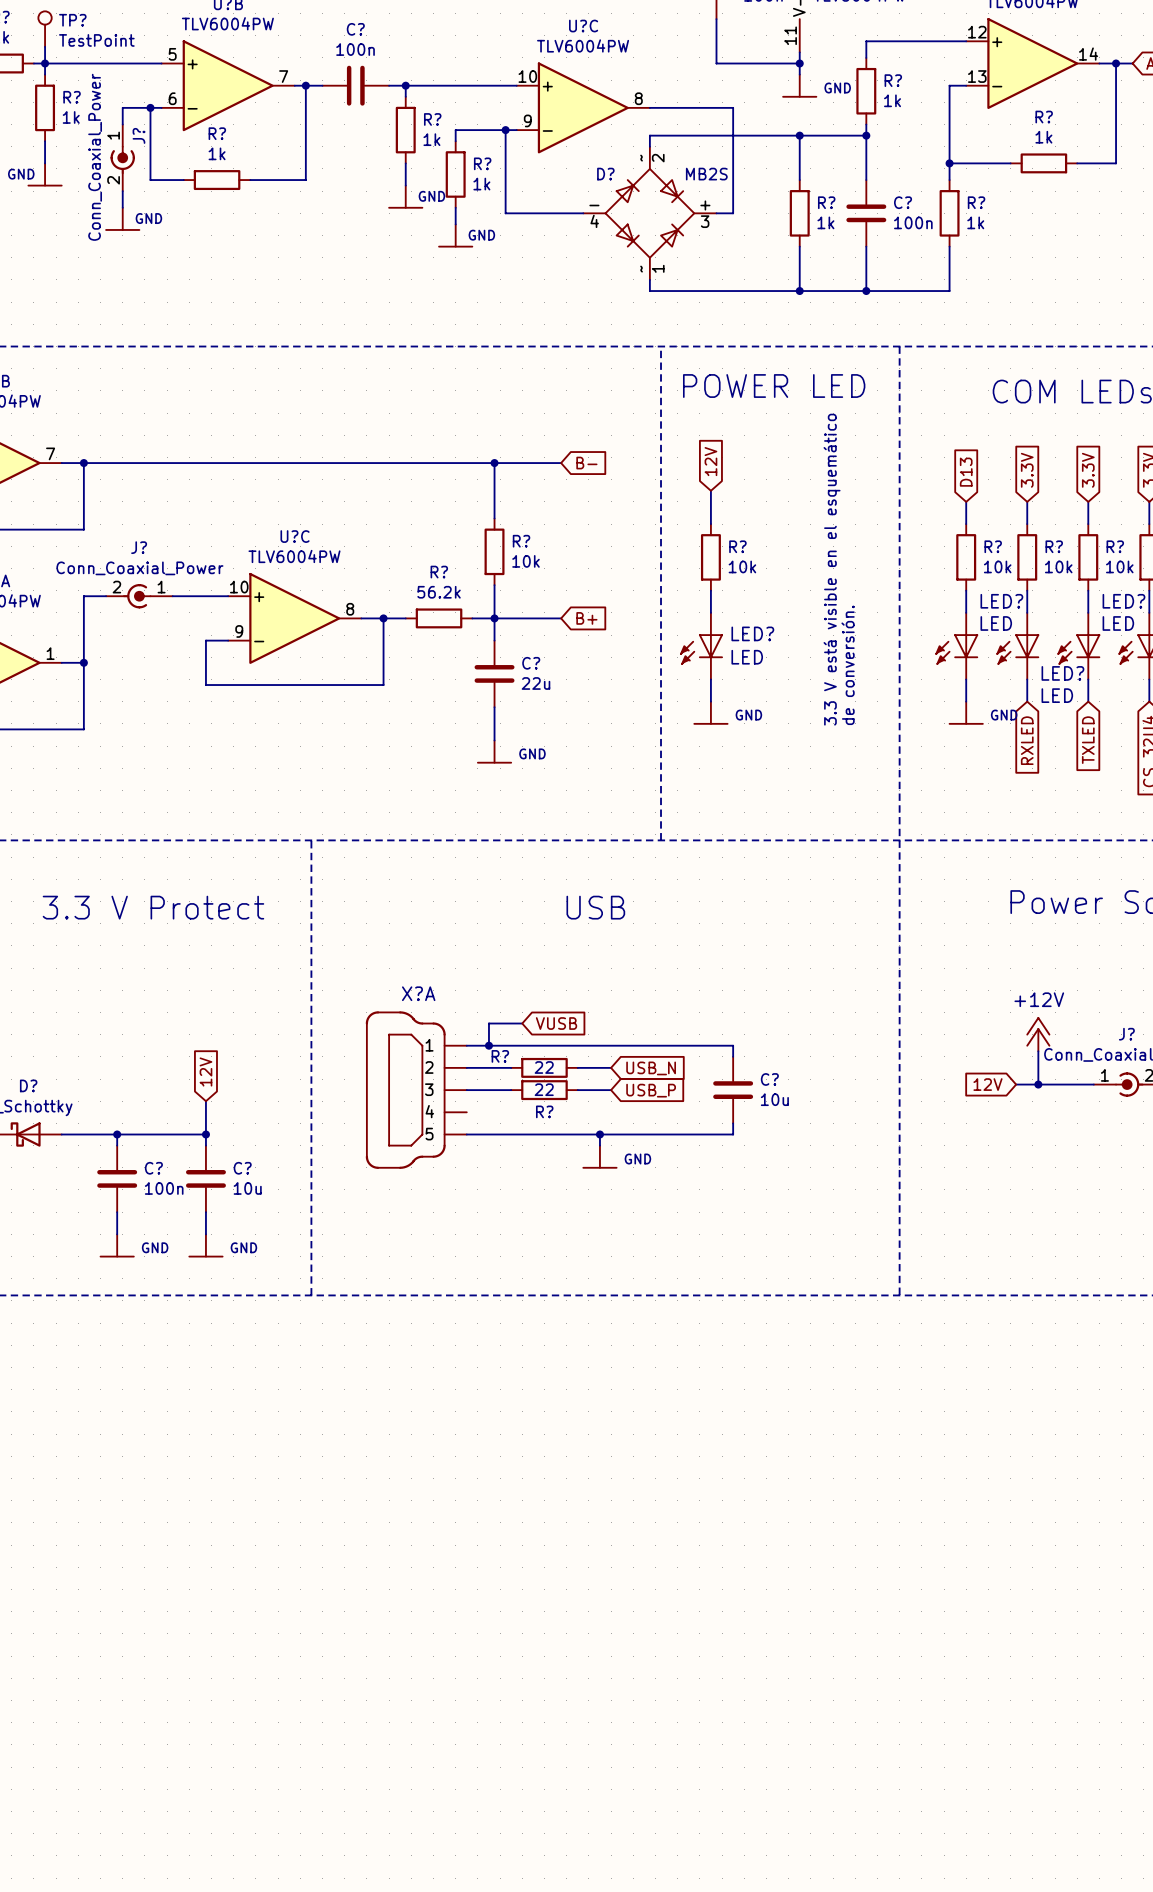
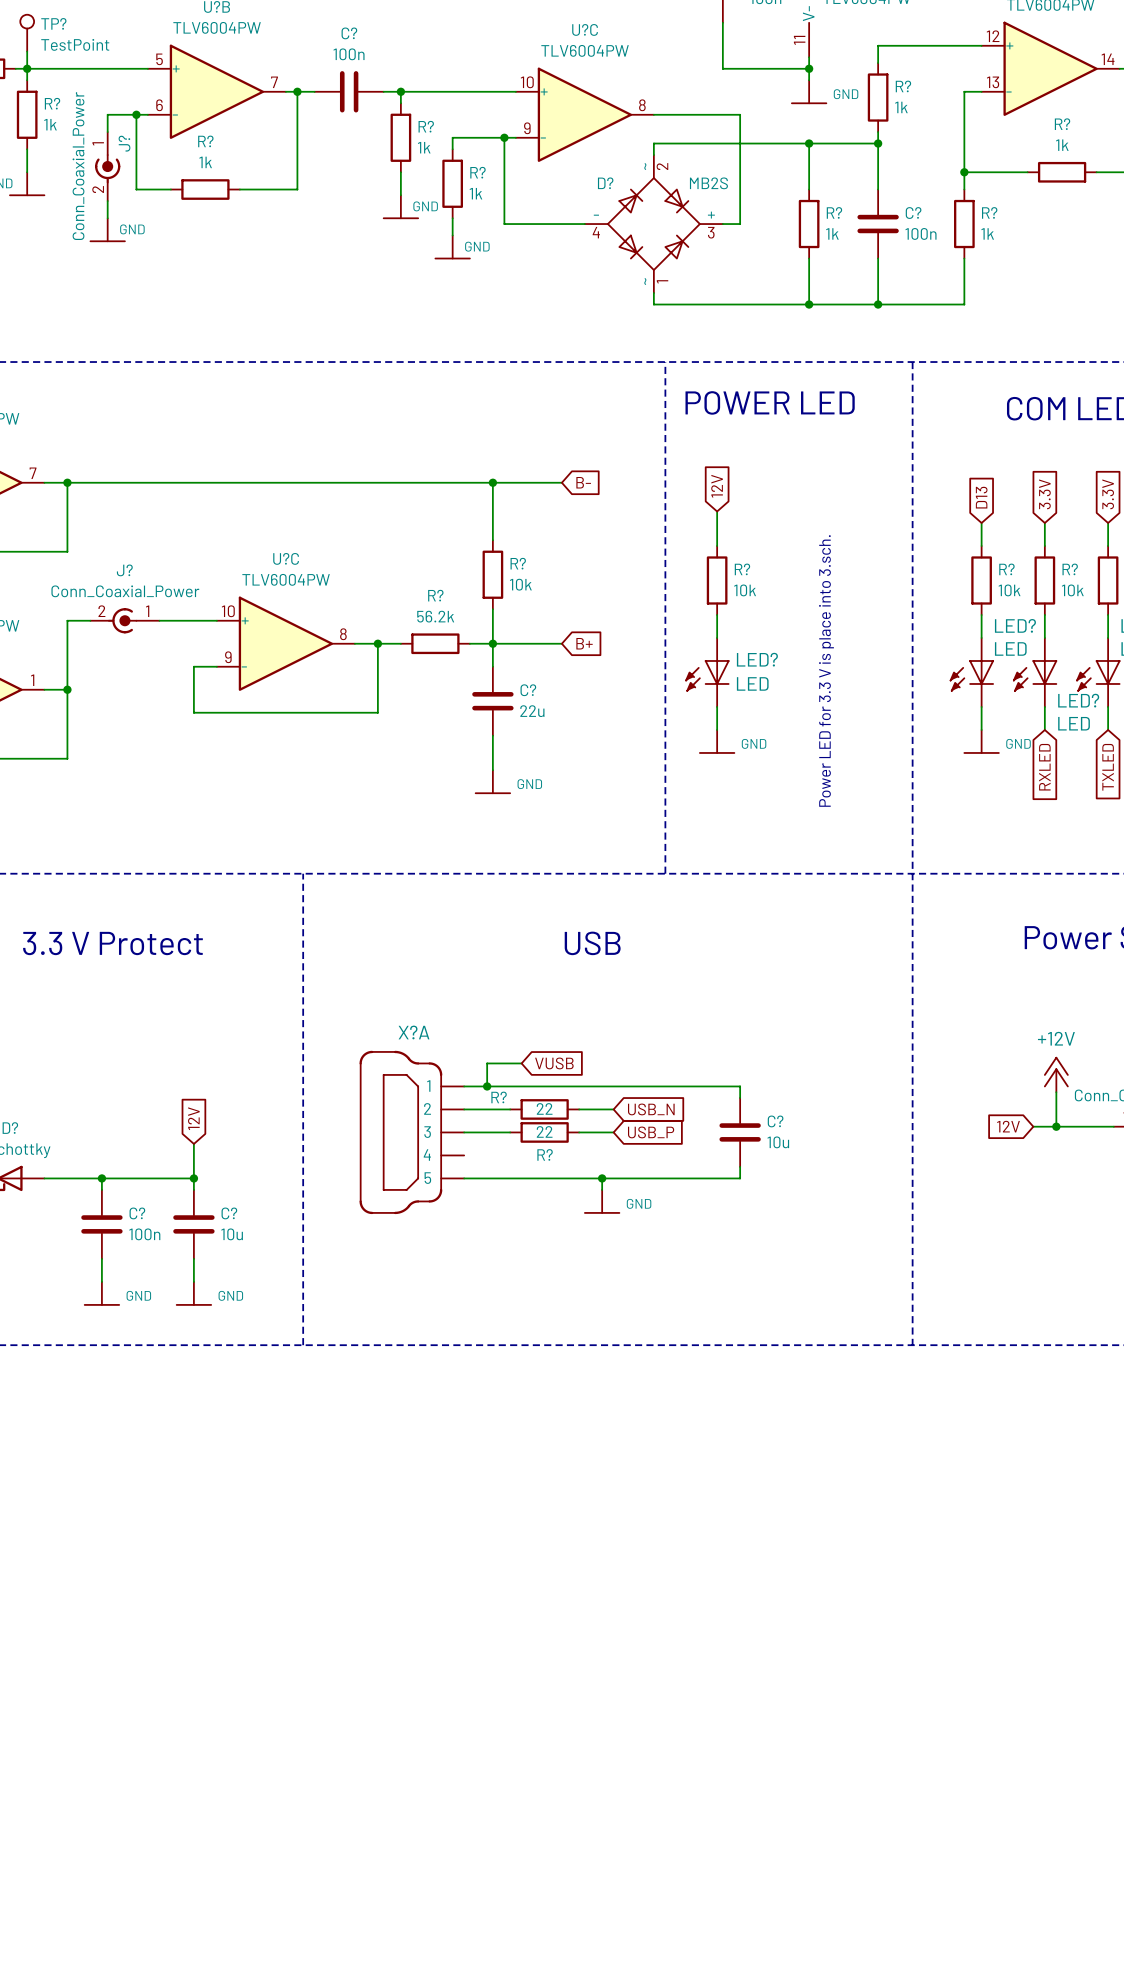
text: 3.3 V está visible en el esquemático (832, 569) -> none
text: none -> Power LED for 3.3 V is place into 3.sch. (826, 670)
text: de conversión. (848, 665) -> none

